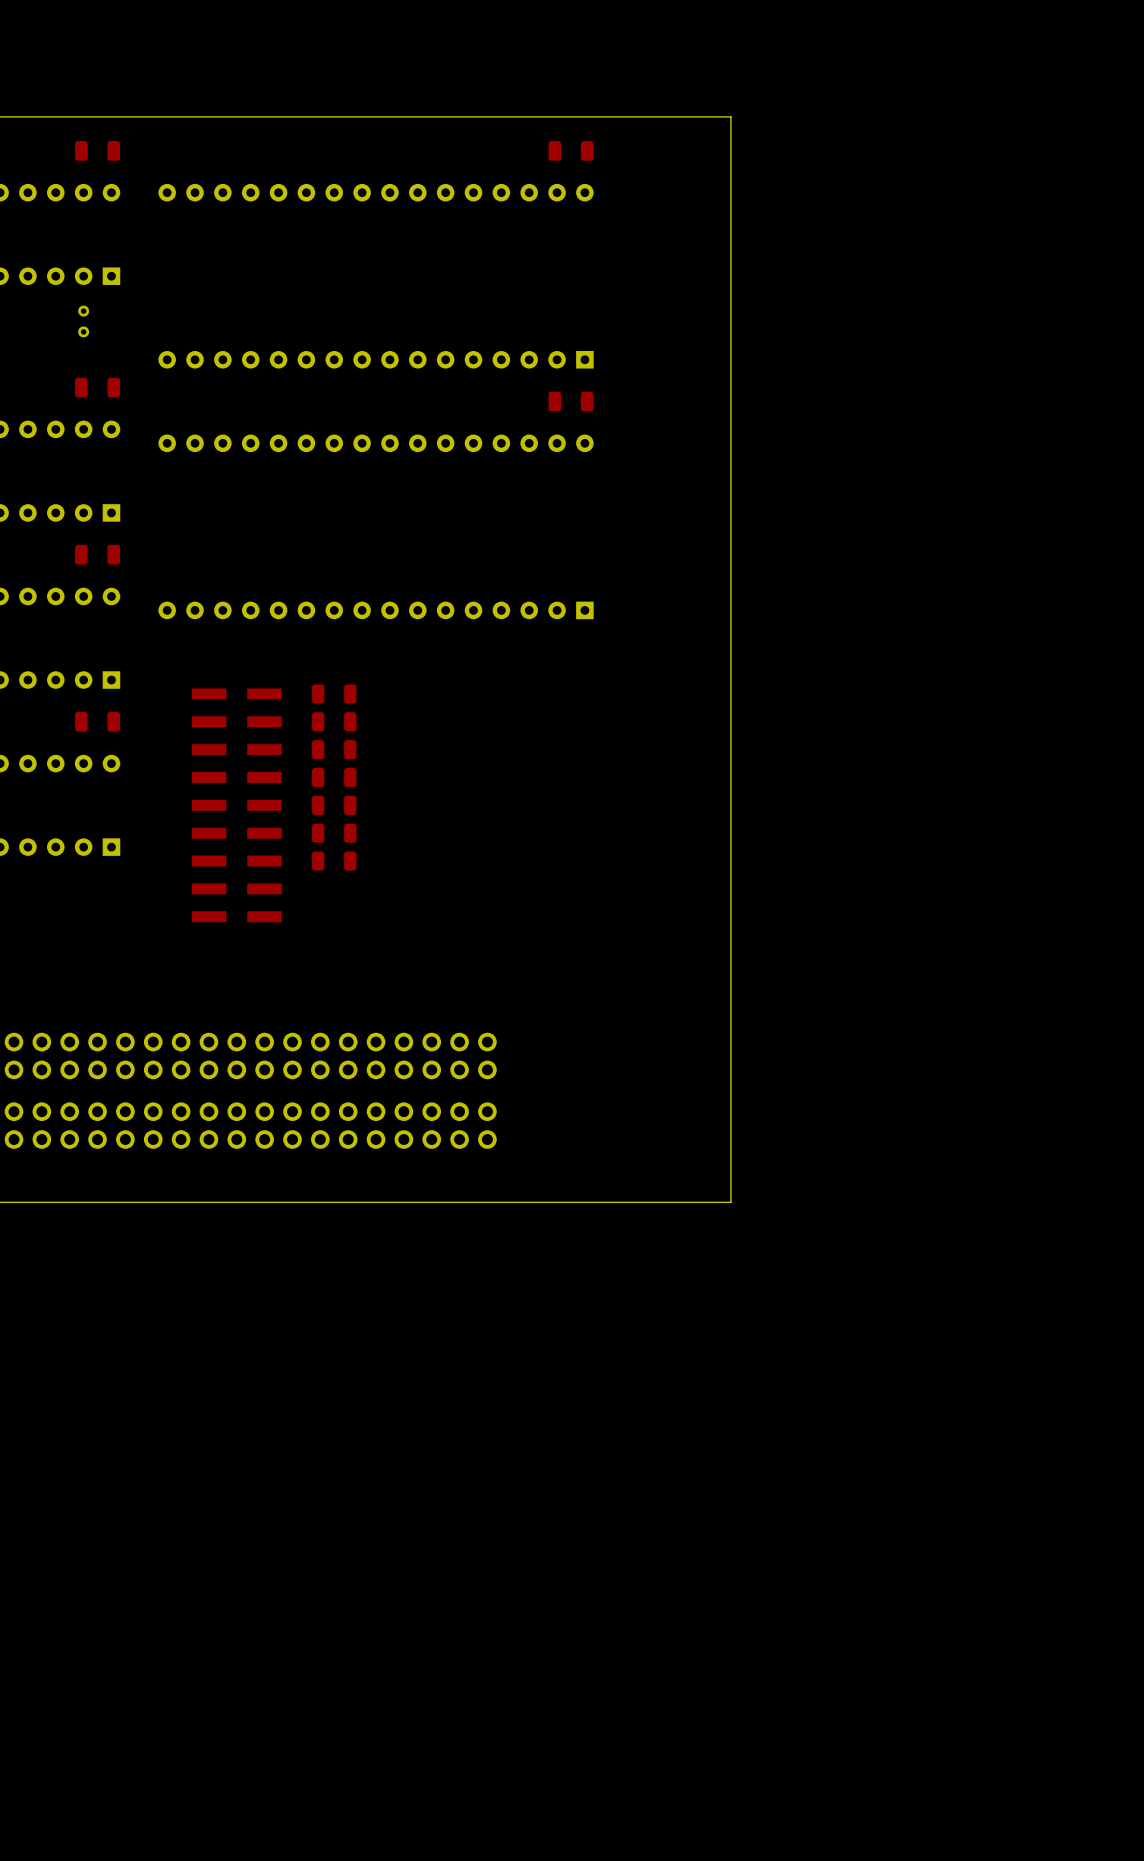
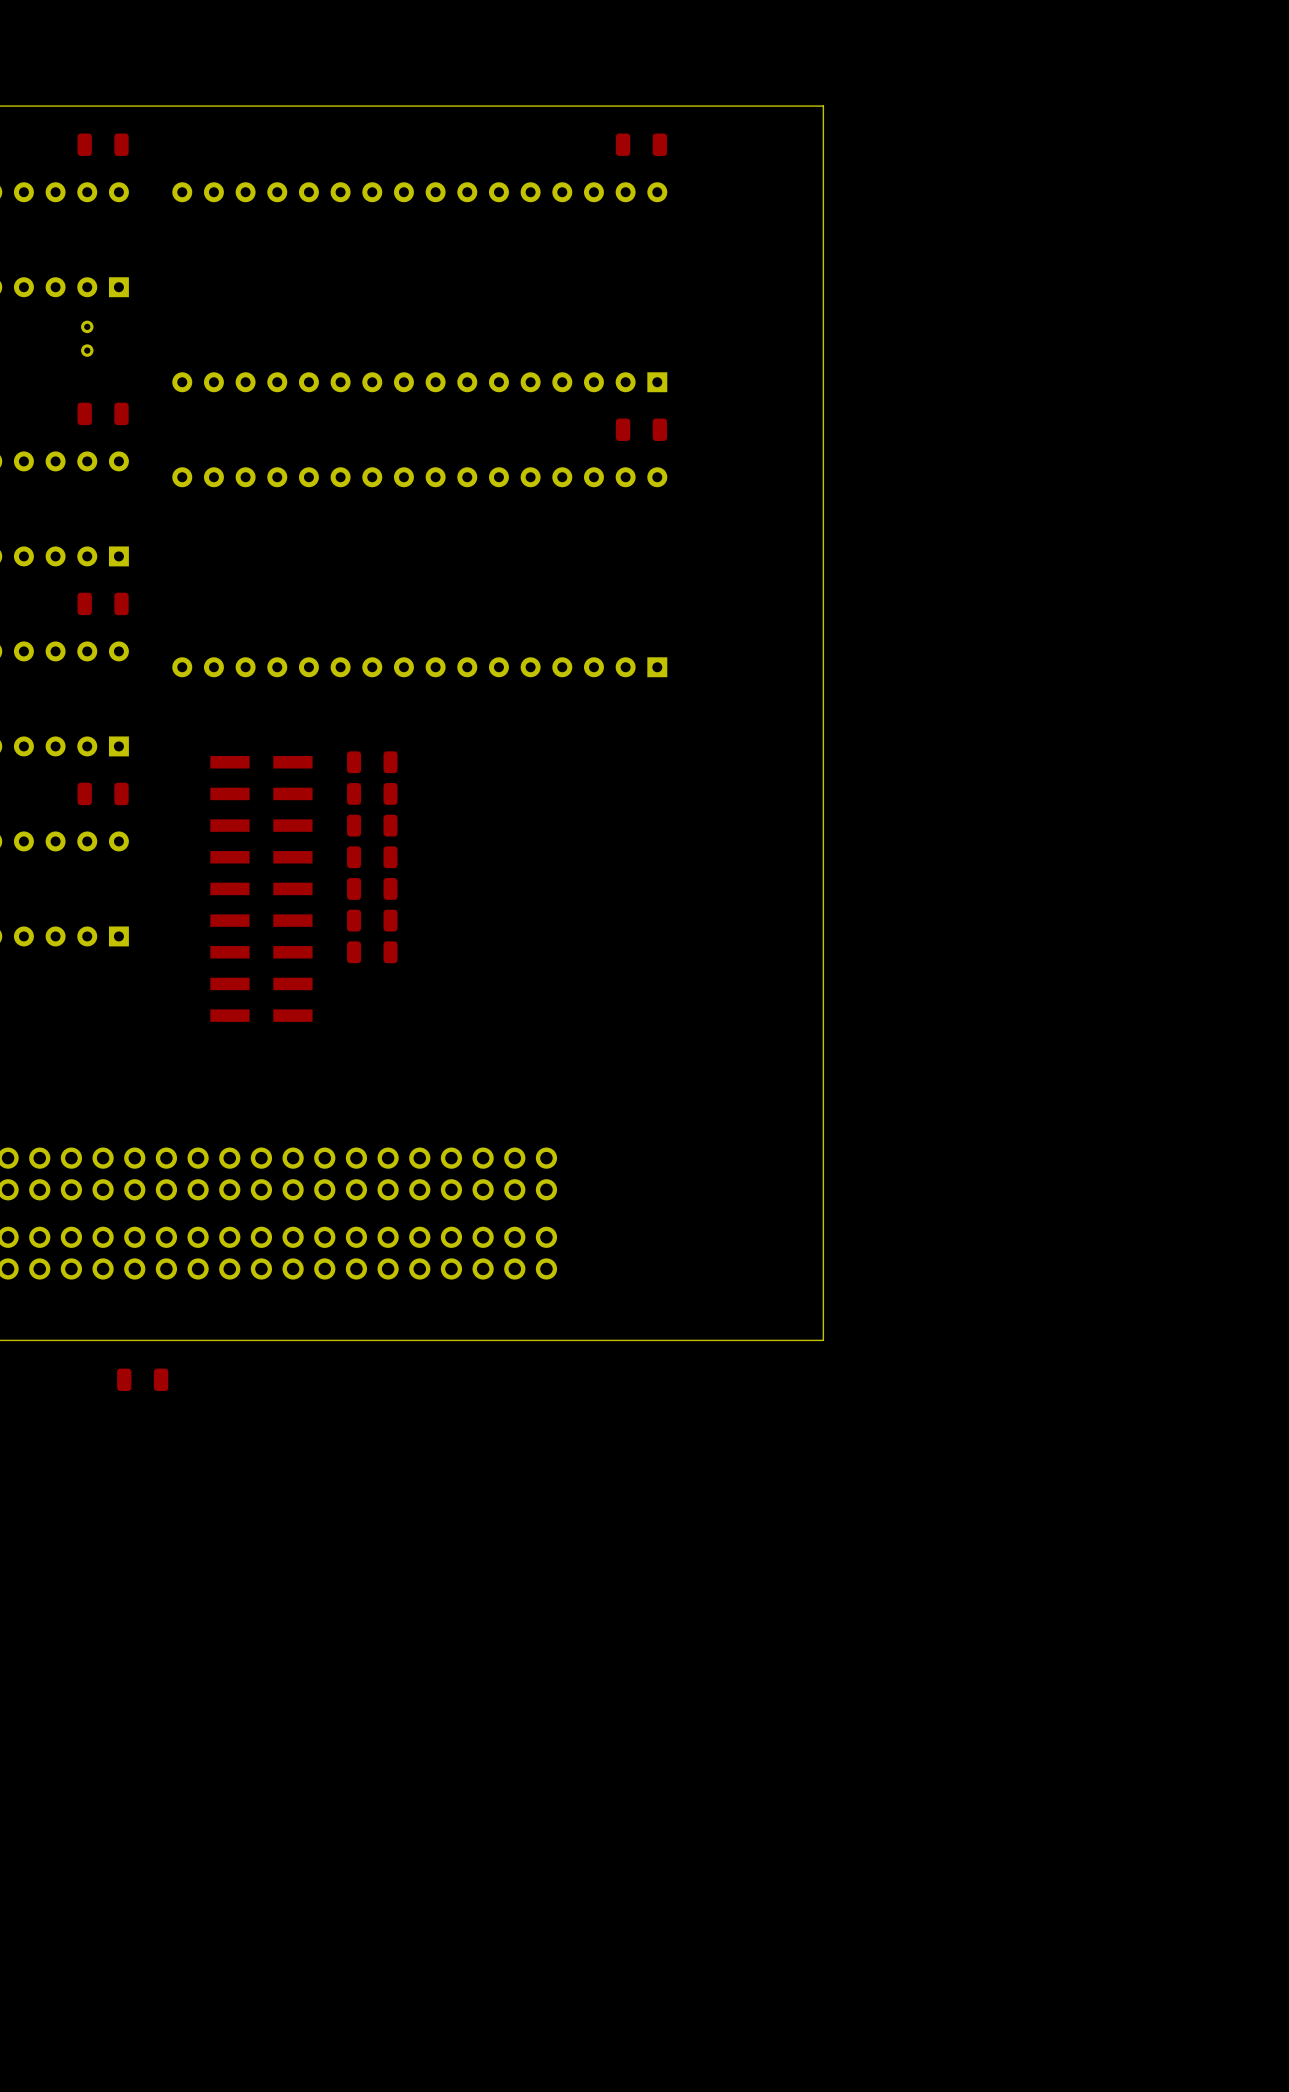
part: none -> (142, 1379)

